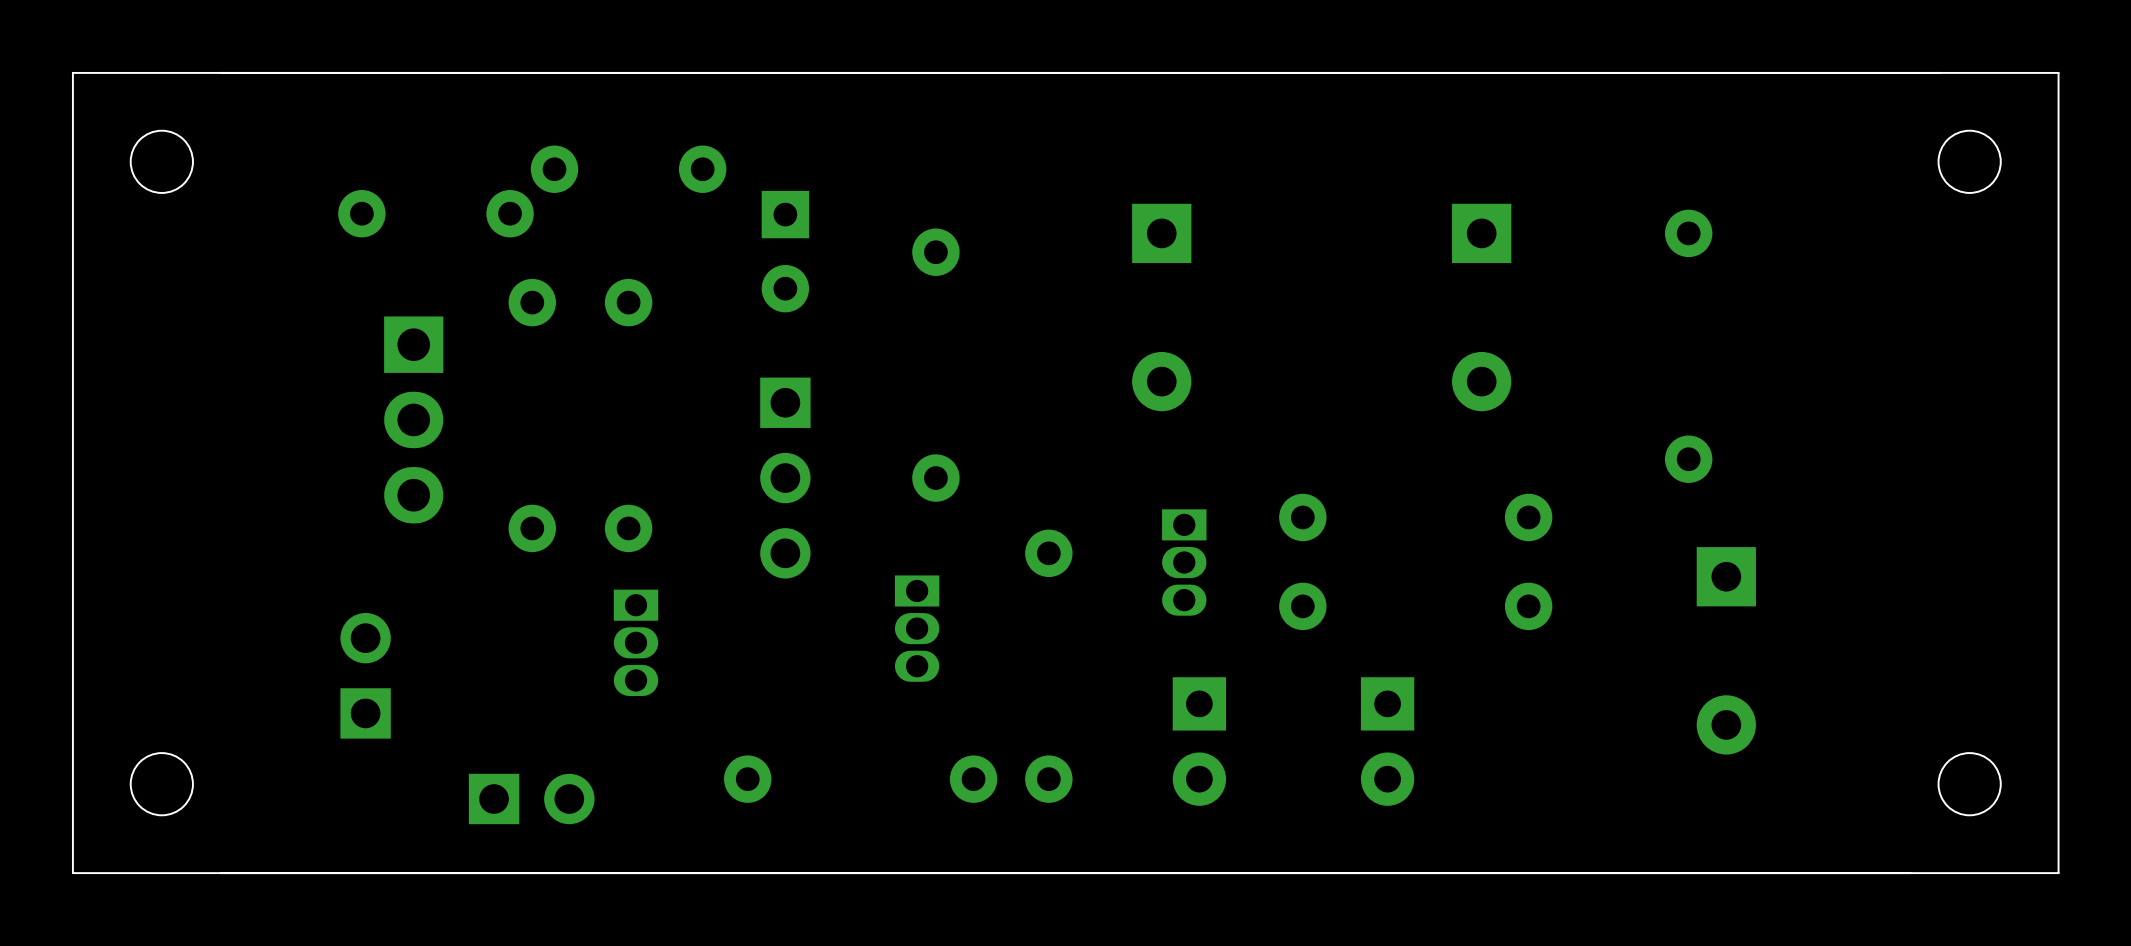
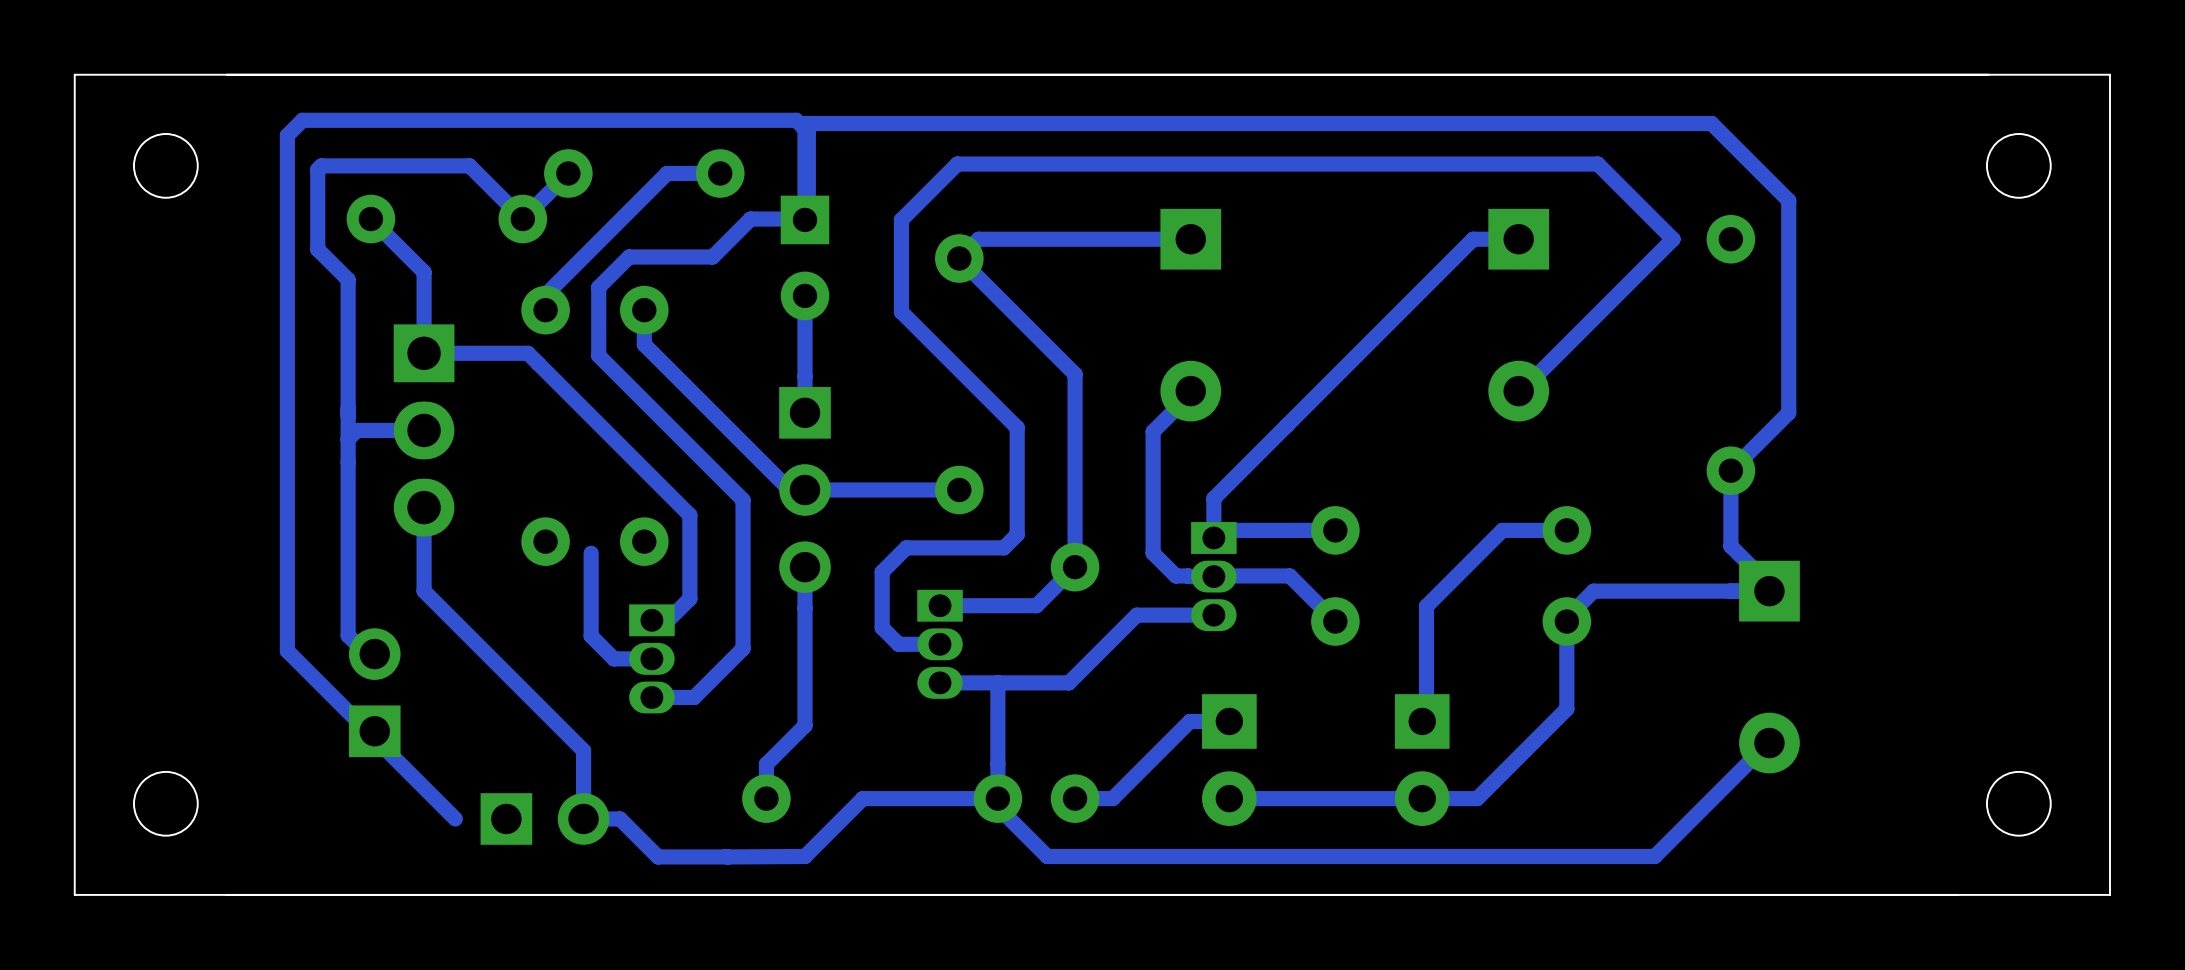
bottom track: none -> (568, 173) (522, 219) (469, 165) (321, 165) (317, 169) (317, 249) (348, 279) (348, 635) (370, 659)
bottom track: none -> (720, 173) (667, 173) (545, 294) (545, 310)
bottom track: none -> (370, 219) (424, 272) (424, 353) (527, 353) (689, 515) (689, 598) (668, 620) (651, 620)
bottom track: none -> (805, 219) (805, 123) (1711, 123) (1788, 200) (1788, 412) (1730, 470) (1730, 546) (1775, 591) (1593, 591) (1563, 621)
bottom track: none -> (1190, 239) (978, 239) (959, 258) (1075, 374) (1075, 567) (1036, 605) (959, 605)
bottom track: none -> (1518, 239) (1473, 239) (1213, 498) (1213, 537) (1221, 530) (1335, 530)
bottom track: none -> (805, 297) (805, 412)
bottom track: none -> (644, 310) (644, 344) (792, 492) (803, 492)
bottom track: none -> (1518, 393) (1673, 239) (1597, 164) (957, 164) (901, 219) (901, 311) (1017, 427) (1017, 534) (1003, 547) (906, 547) (882, 572) (882, 627) (898, 644) (940, 644)
bottom track: none -> (1191, 393) (1153, 431) (1153, 553) (1175, 575) (1213, 576)
bottom track: none -> (424, 430) (356, 430) (348, 439)
bottom track: none -> (805, 488) (805, 489) (959, 489)
bottom track: none -> (424, 507) (424, 591) (583, 750) (583, 818) (620, 818) (658, 856) (727, 856)
bottom track: none -> (1566, 530) (1502, 530) (1426, 606) (1426, 720)
bottom track: none -> (591, 553) (591, 636) (613, 658) (651, 658)
bottom track: none -> (805, 567) (805, 725) (766, 764) (766, 798)
bottom track: none -> (1206, 575) (1289, 575) (1335, 621)
bottom track: none -> (1213, 615) (1136, 615) (1068, 682) (959, 682)
bottom track: none -> (1566, 621) (1566, 709) (1477, 798) (1229, 798)
bottom track: none -> (997, 682) (997, 807) (1047, 856) (1654, 856) (1768, 743)
bottom track: none -> (651, 697) (694, 697) (743, 648) (743, 500) (598, 355) (598, 287) (629, 257) (712, 257) (750, 219) (811, 219) (808, 215) (808, 132) (796, 120) (302, 120) (287, 135) (287, 650) (455, 818)
bottom track: none -> (1229, 721) (1189, 721) (1112, 798) (1075, 798)
bottom track: none -> (997, 798) (862, 798) (805, 856) (727, 856)

